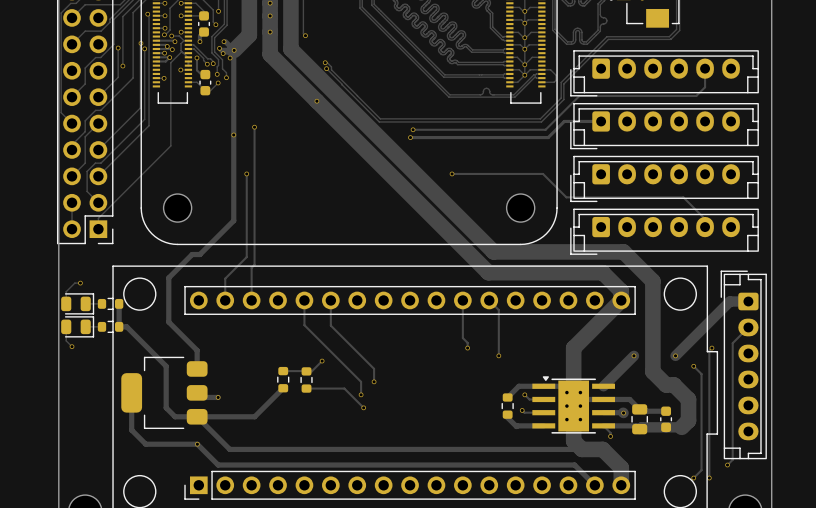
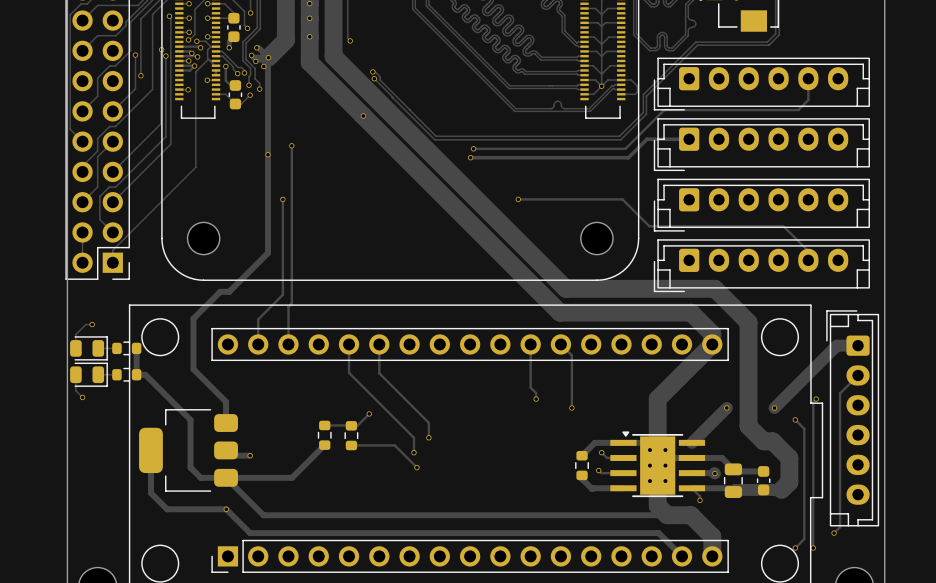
via: (524, 11) -> none
via: (524, 23) -> none
via: (524, 37) -> none
via: (524, 49) -> none
via: (524, 64) -> none

